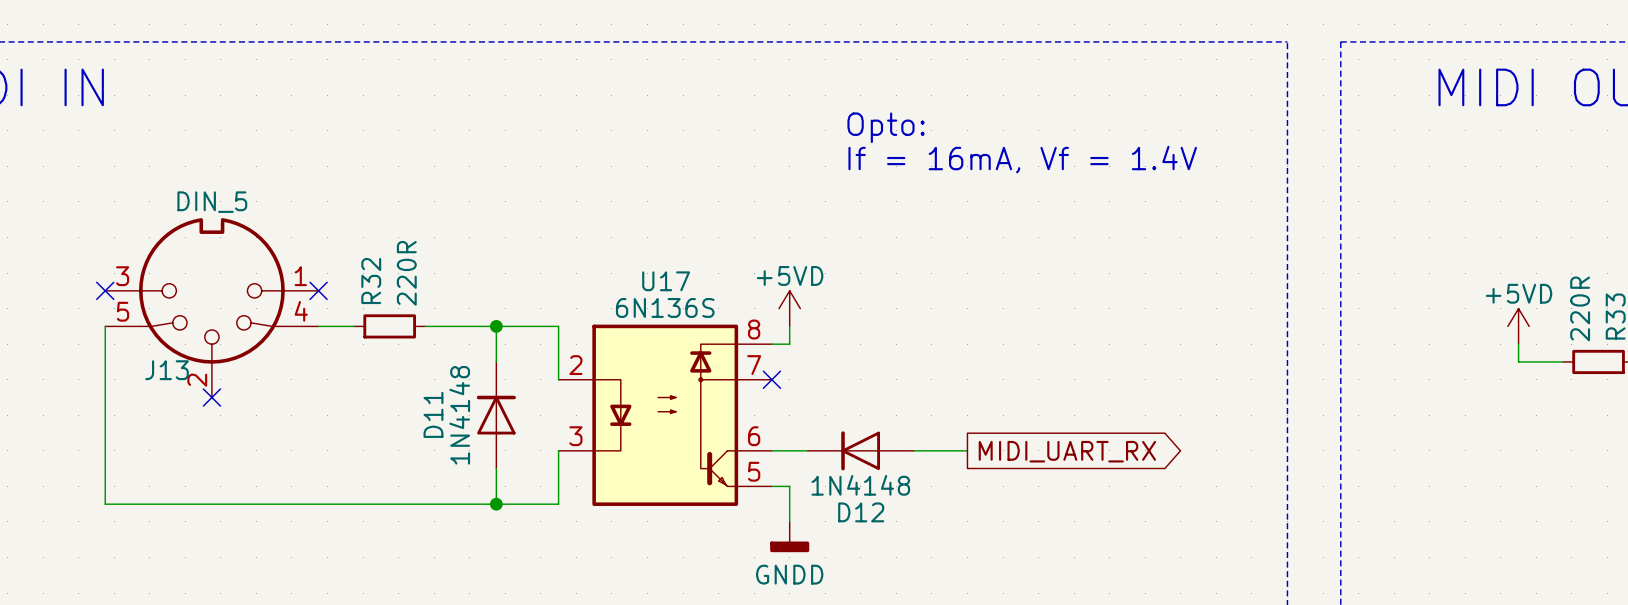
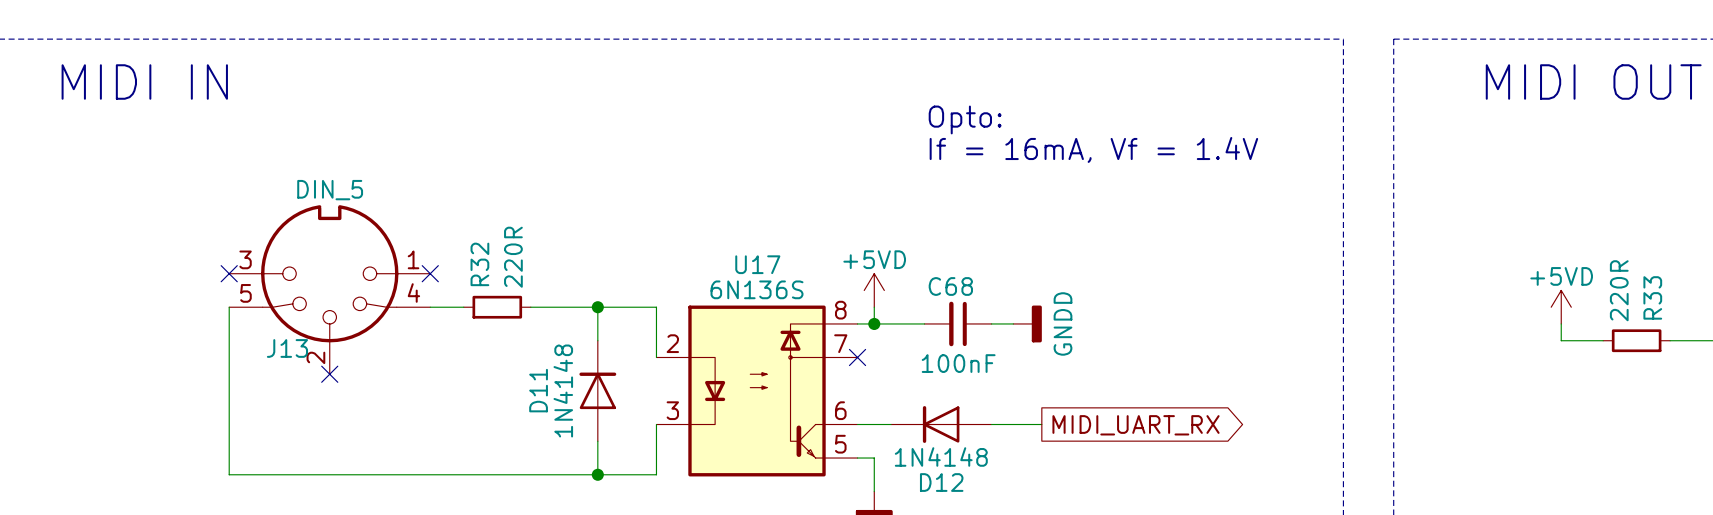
wire: none -> (874, 323) (924, 323)
junction: none -> (874, 323)
C68: none -> 100nF (958, 323)
wire: none -> (991, 323) (1013, 323)
power symbol: none -> GNDD (1027, 323)

